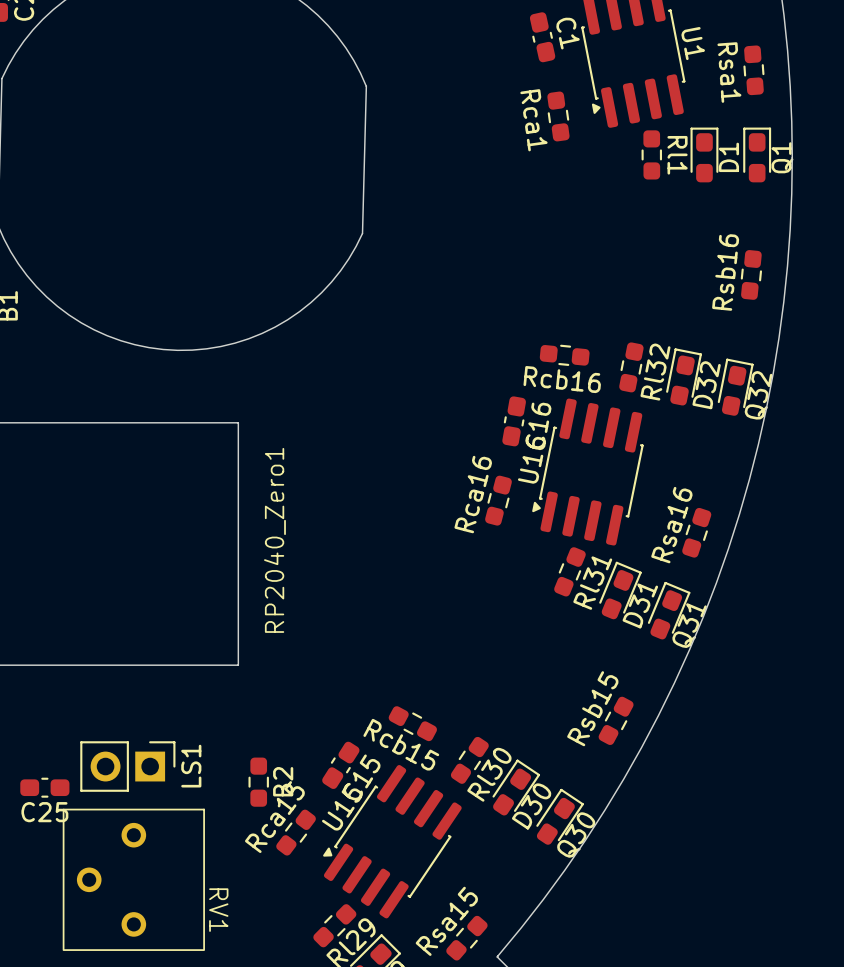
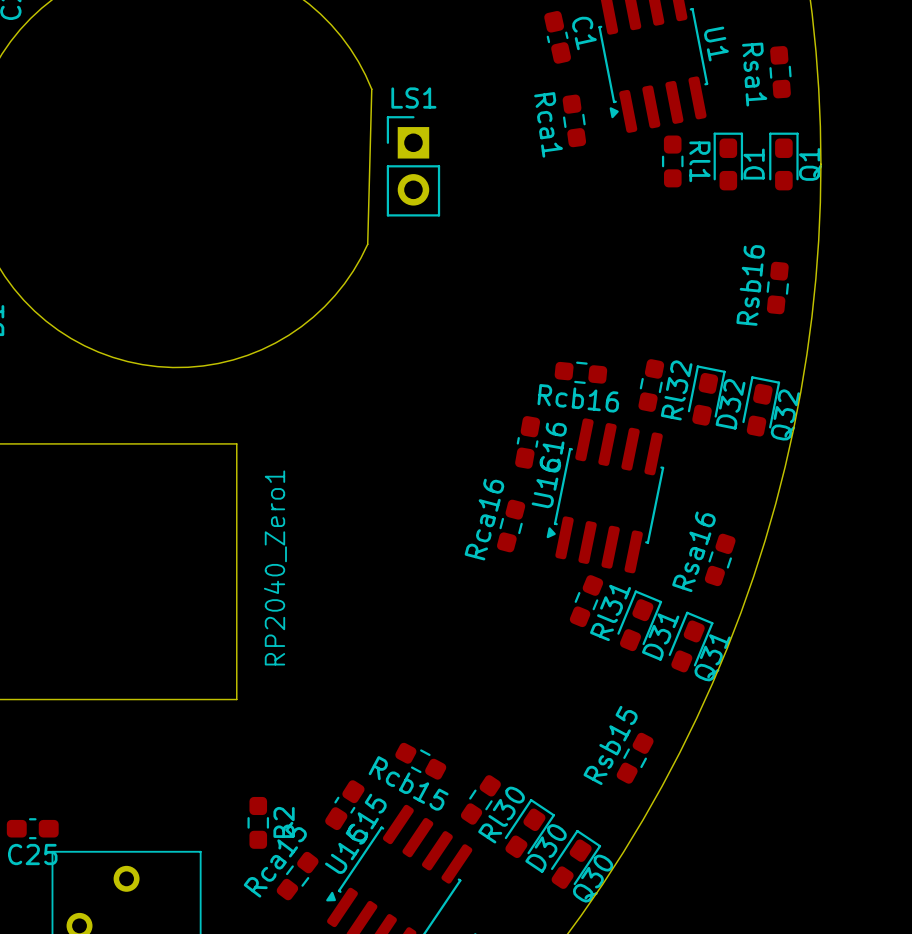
LS1 rotation: 0° (127, 766) -> 90° counterclockwise (413, 166)
LS1 position: (127, 766) -> (413, 166)

